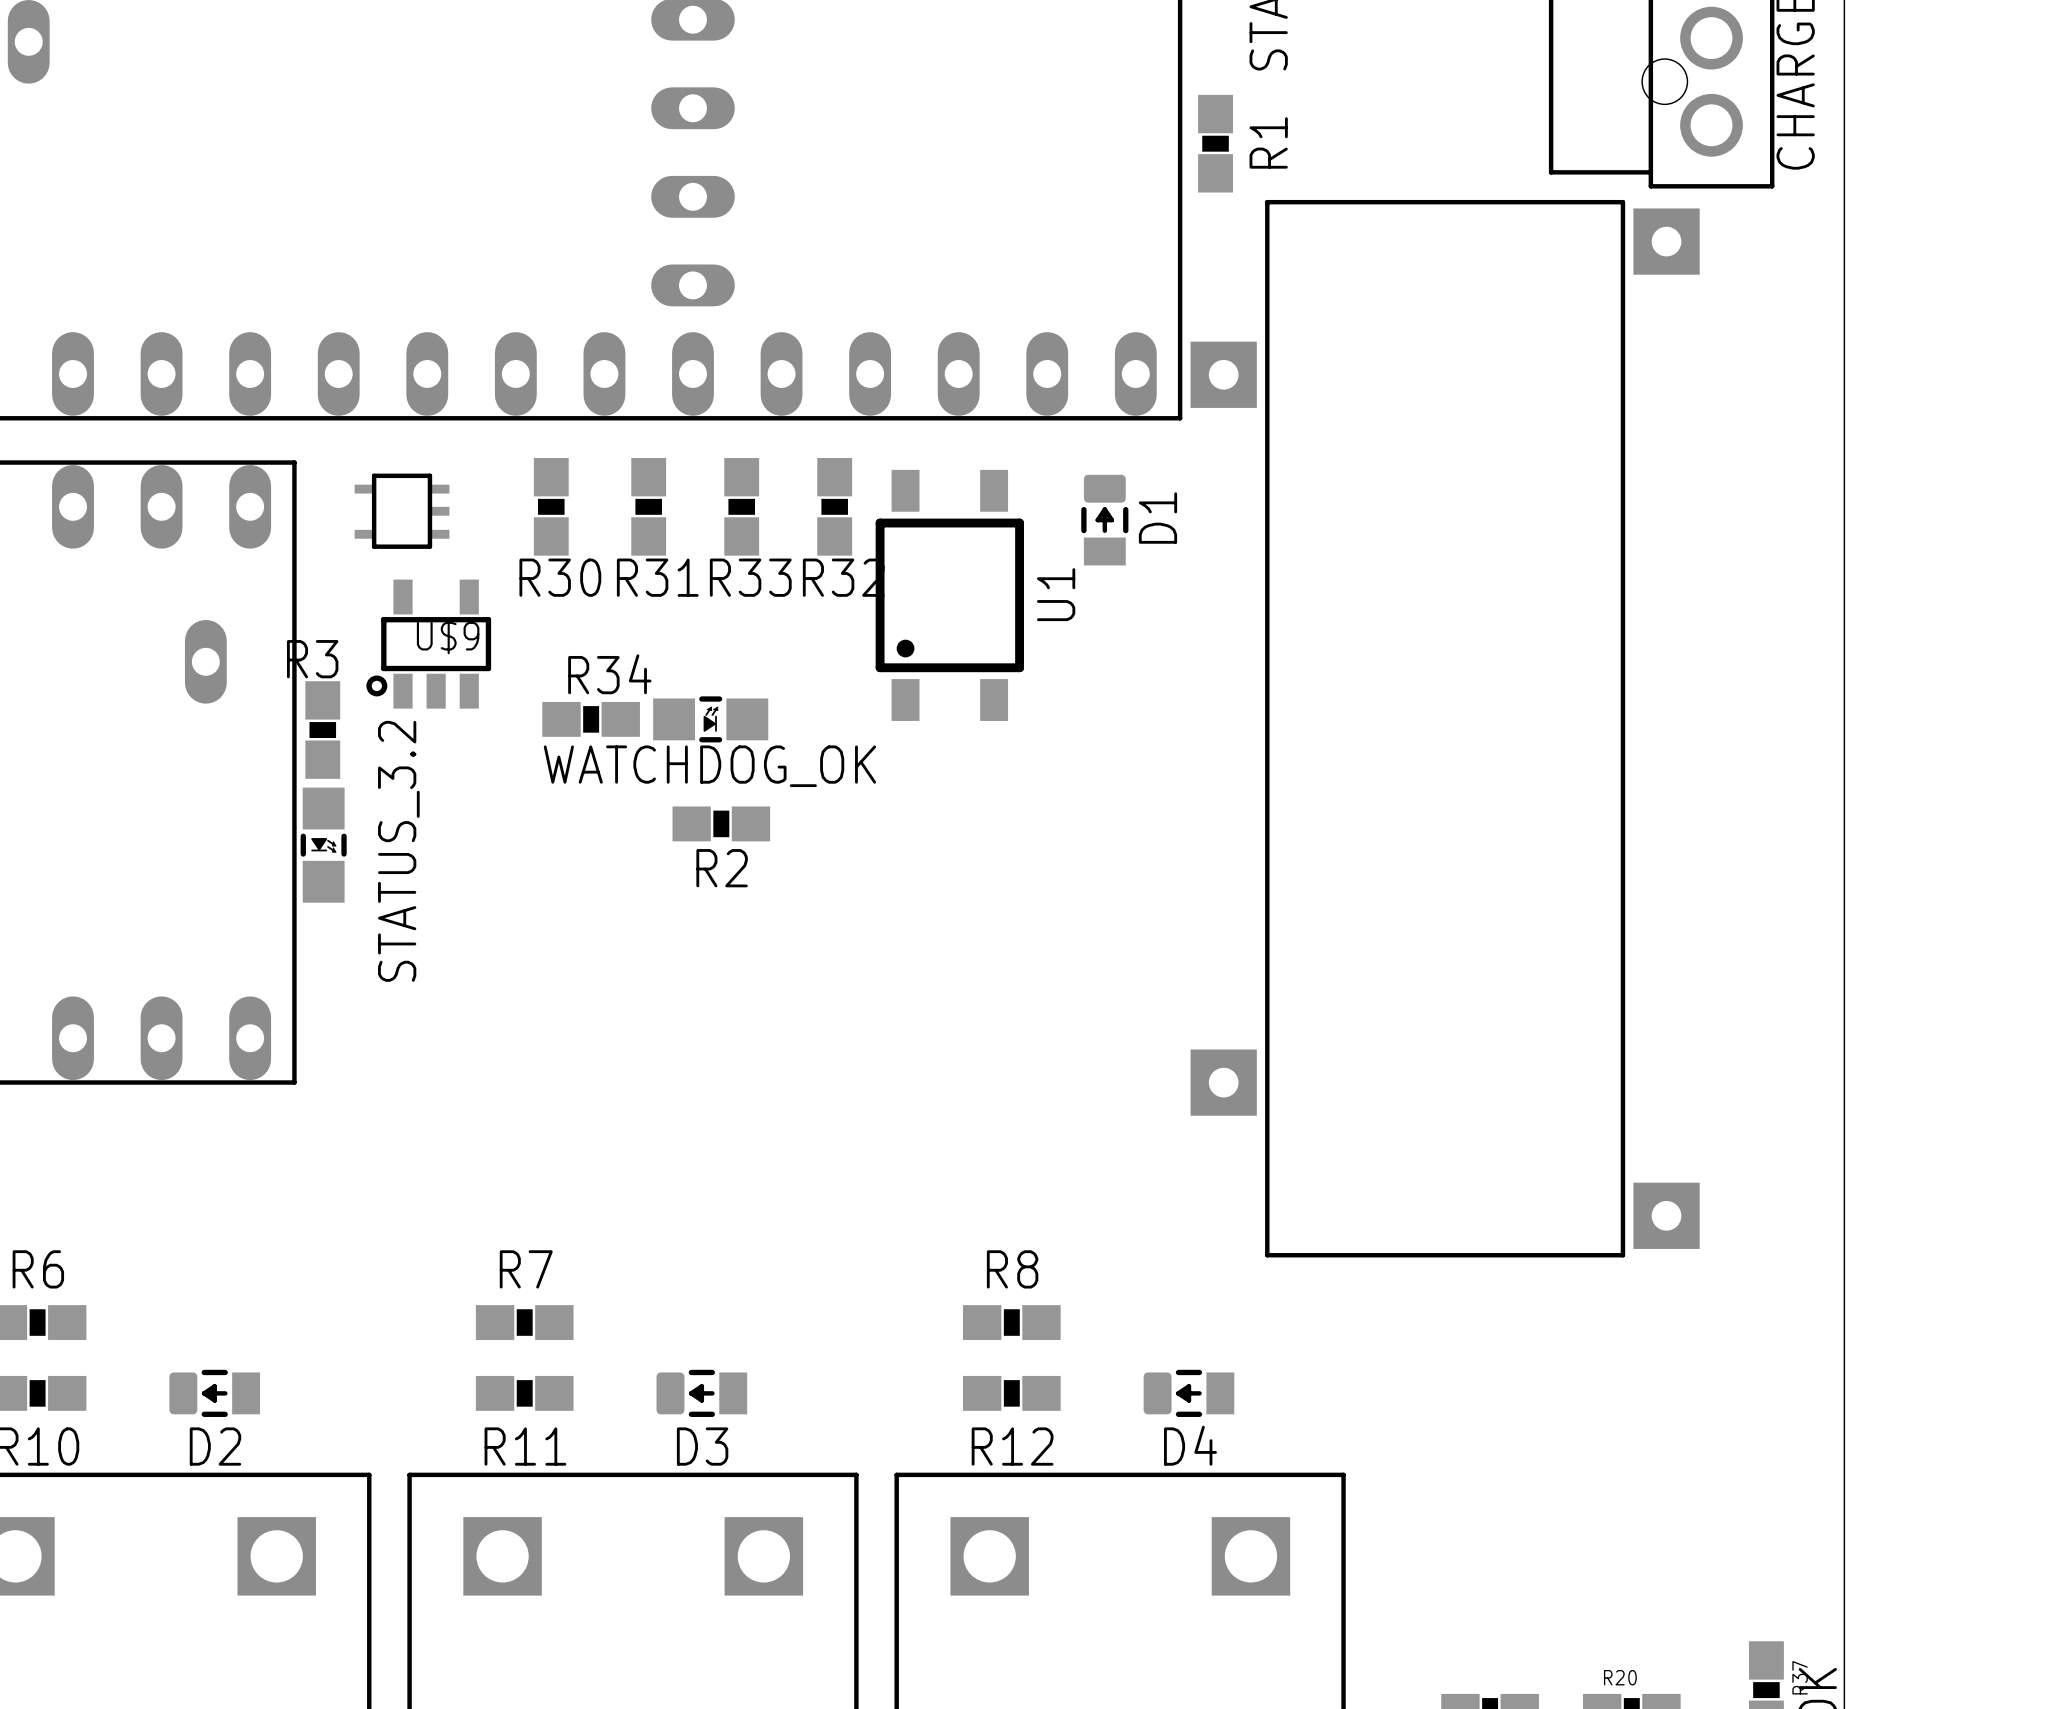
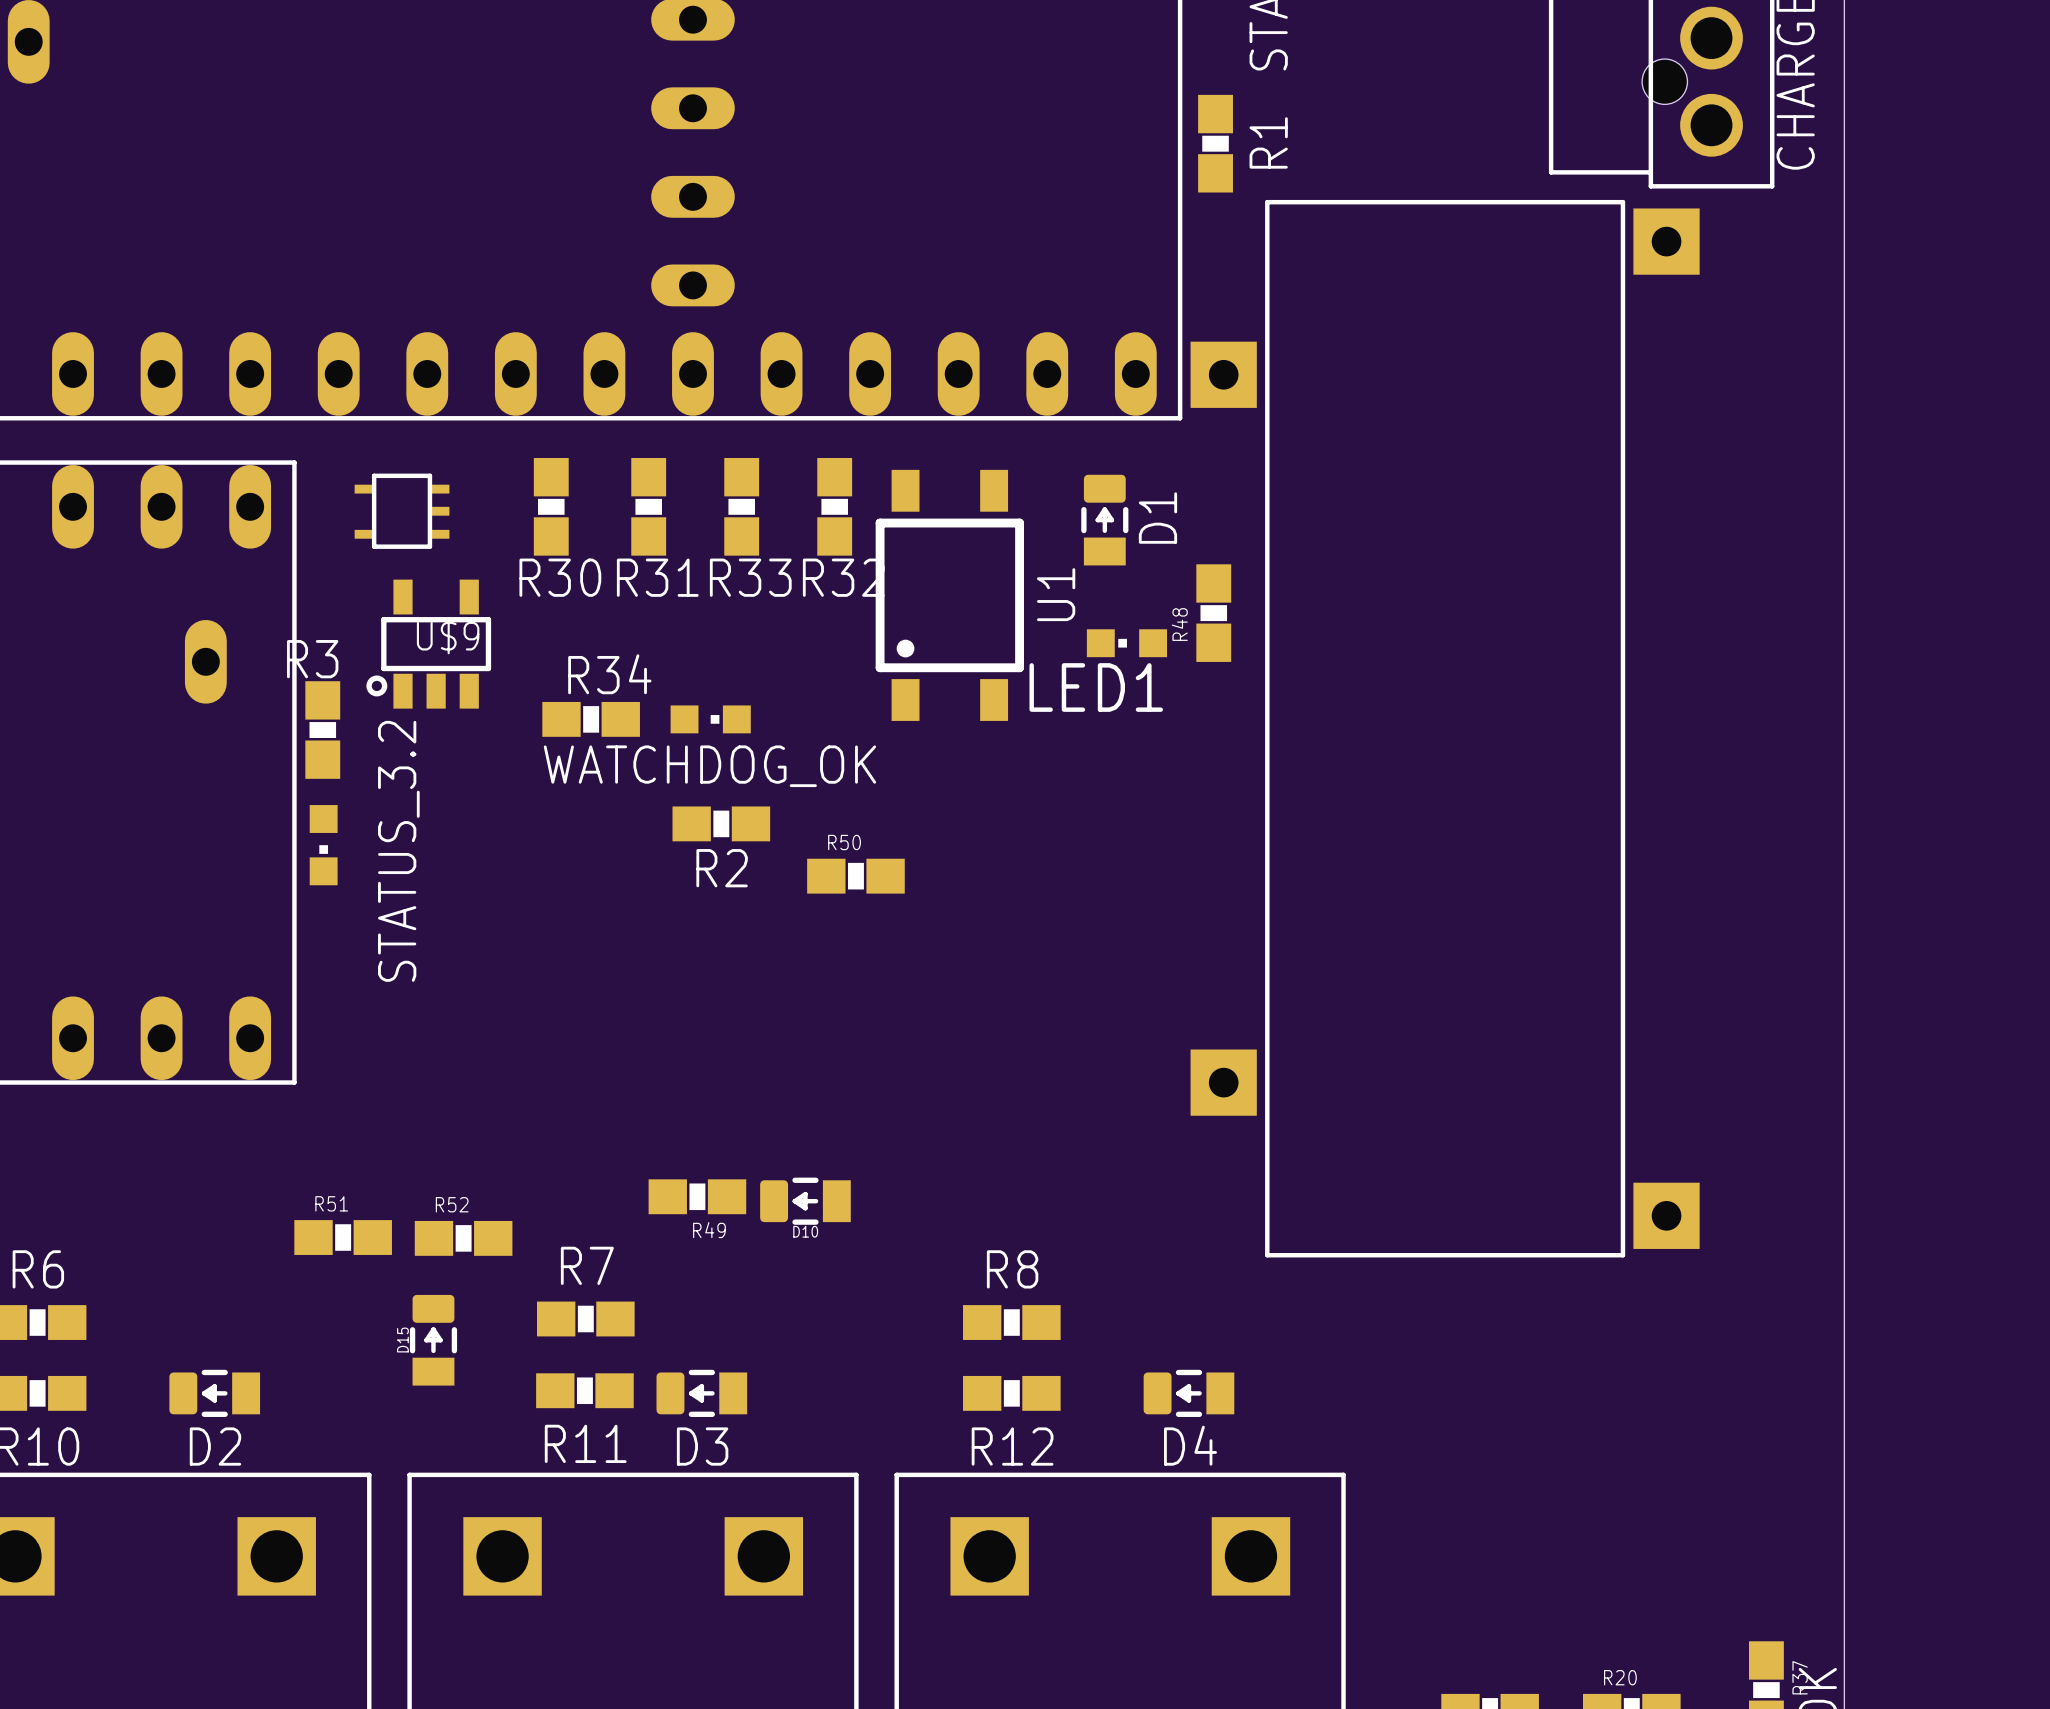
R48: none -> (1213, 613)
LED1: none -> (1126, 643)
WATCHDOG_OK footprint: [653, 696, 769, 743] -> [670, 705, 751, 734]
STATUS_3.2 footprint: [300, 787, 347, 903] -> [309, 805, 338, 886]
R50: none -> (855, 876)
R49: none -> (697, 1196)
D10: none -> (805, 1201)
R51: none -> (343, 1237)
R52: none -> (463, 1238)
R7 position: (524, 1322) -> (585, 1318)
D15: none -> (433, 1340)
R11 position: (524, 1393) -> (584, 1390)

